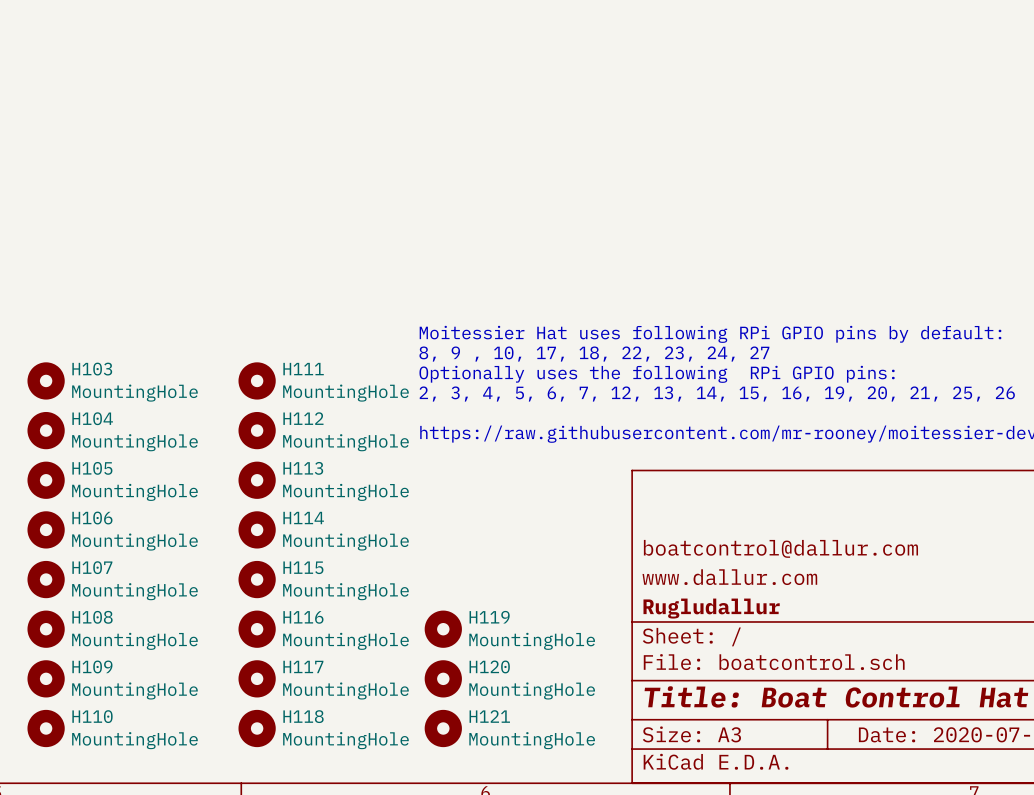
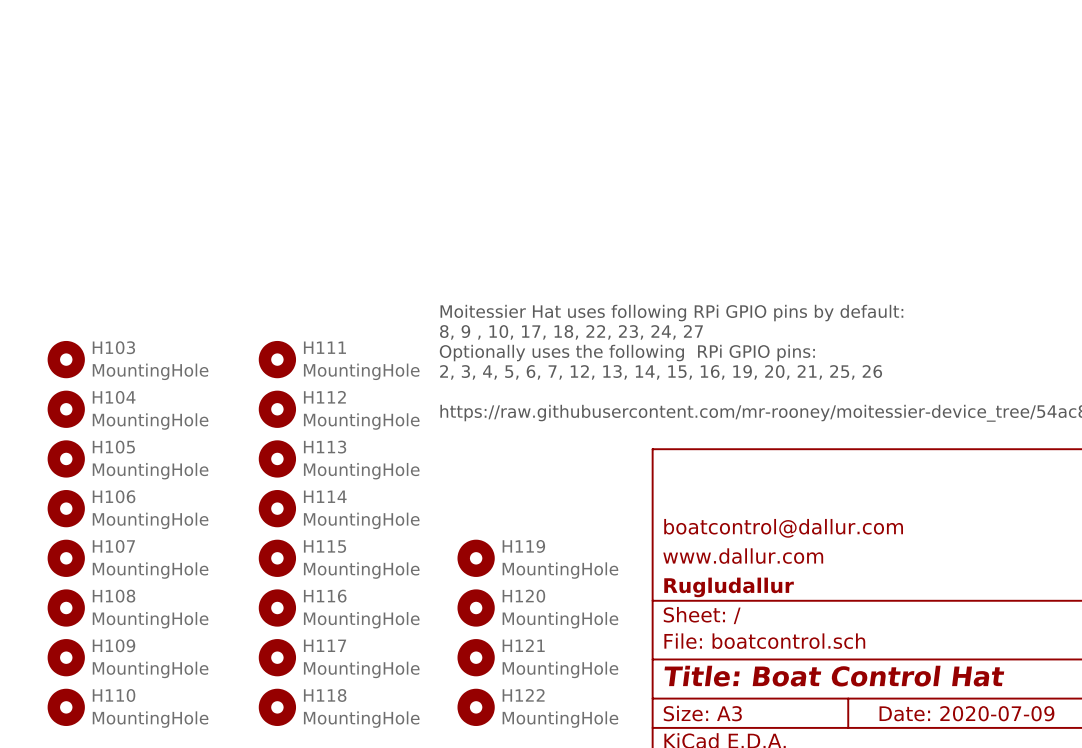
H119 position: (443, 629) -> (476, 558)
H120 position: (443, 678) -> (476, 608)
H121 position: (443, 728) -> (476, 657)
H122: none -> MountingHole (476, 707)

